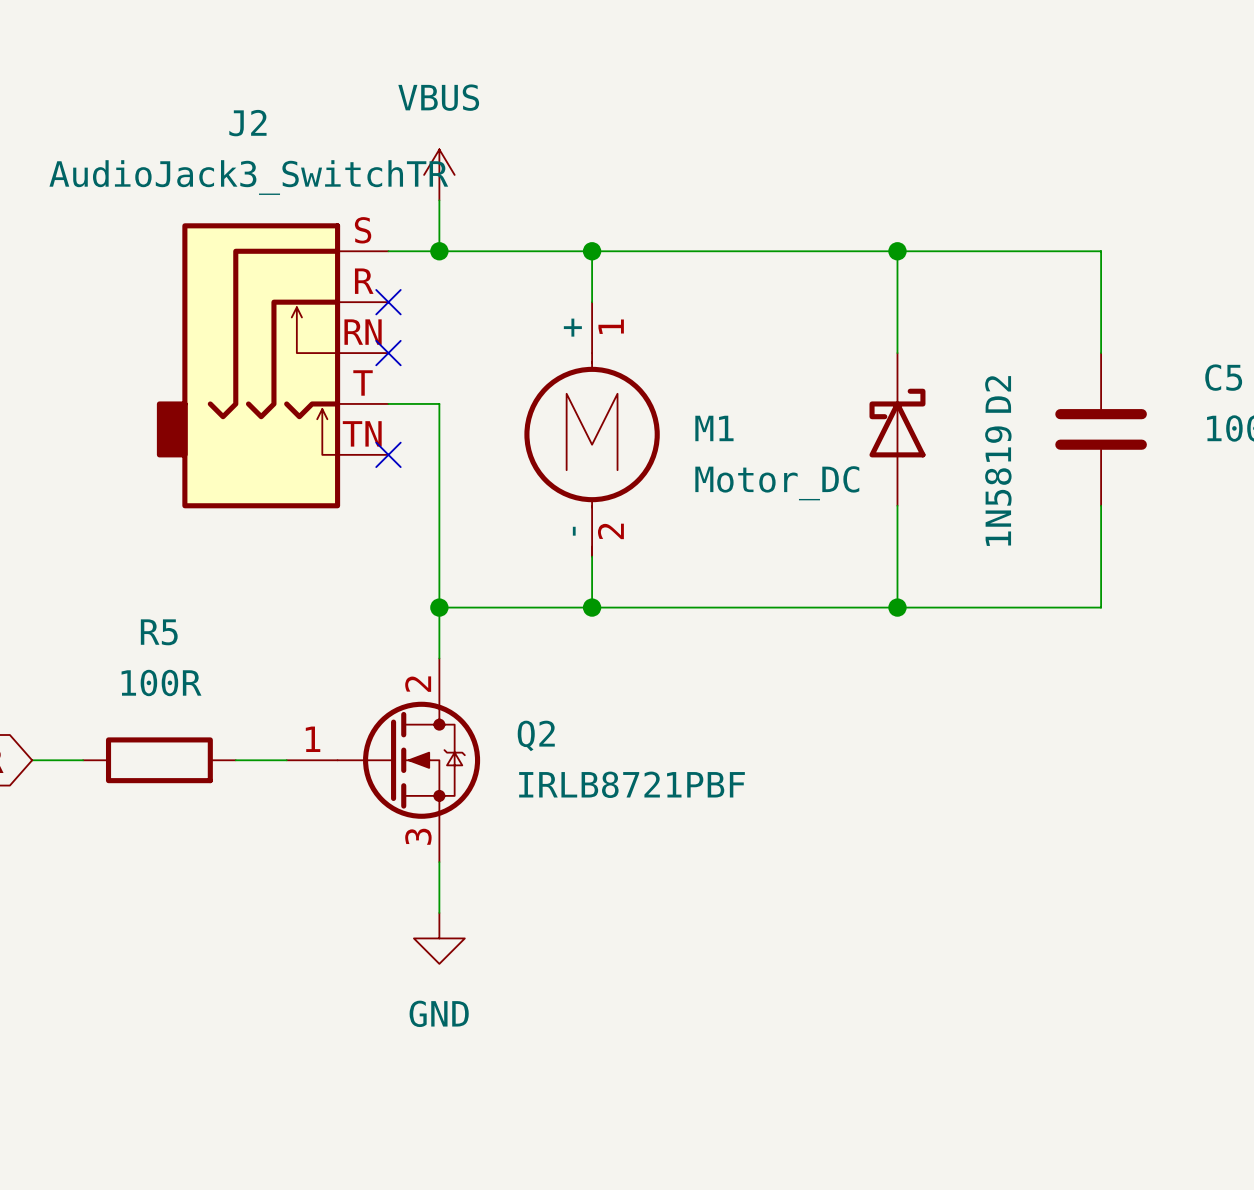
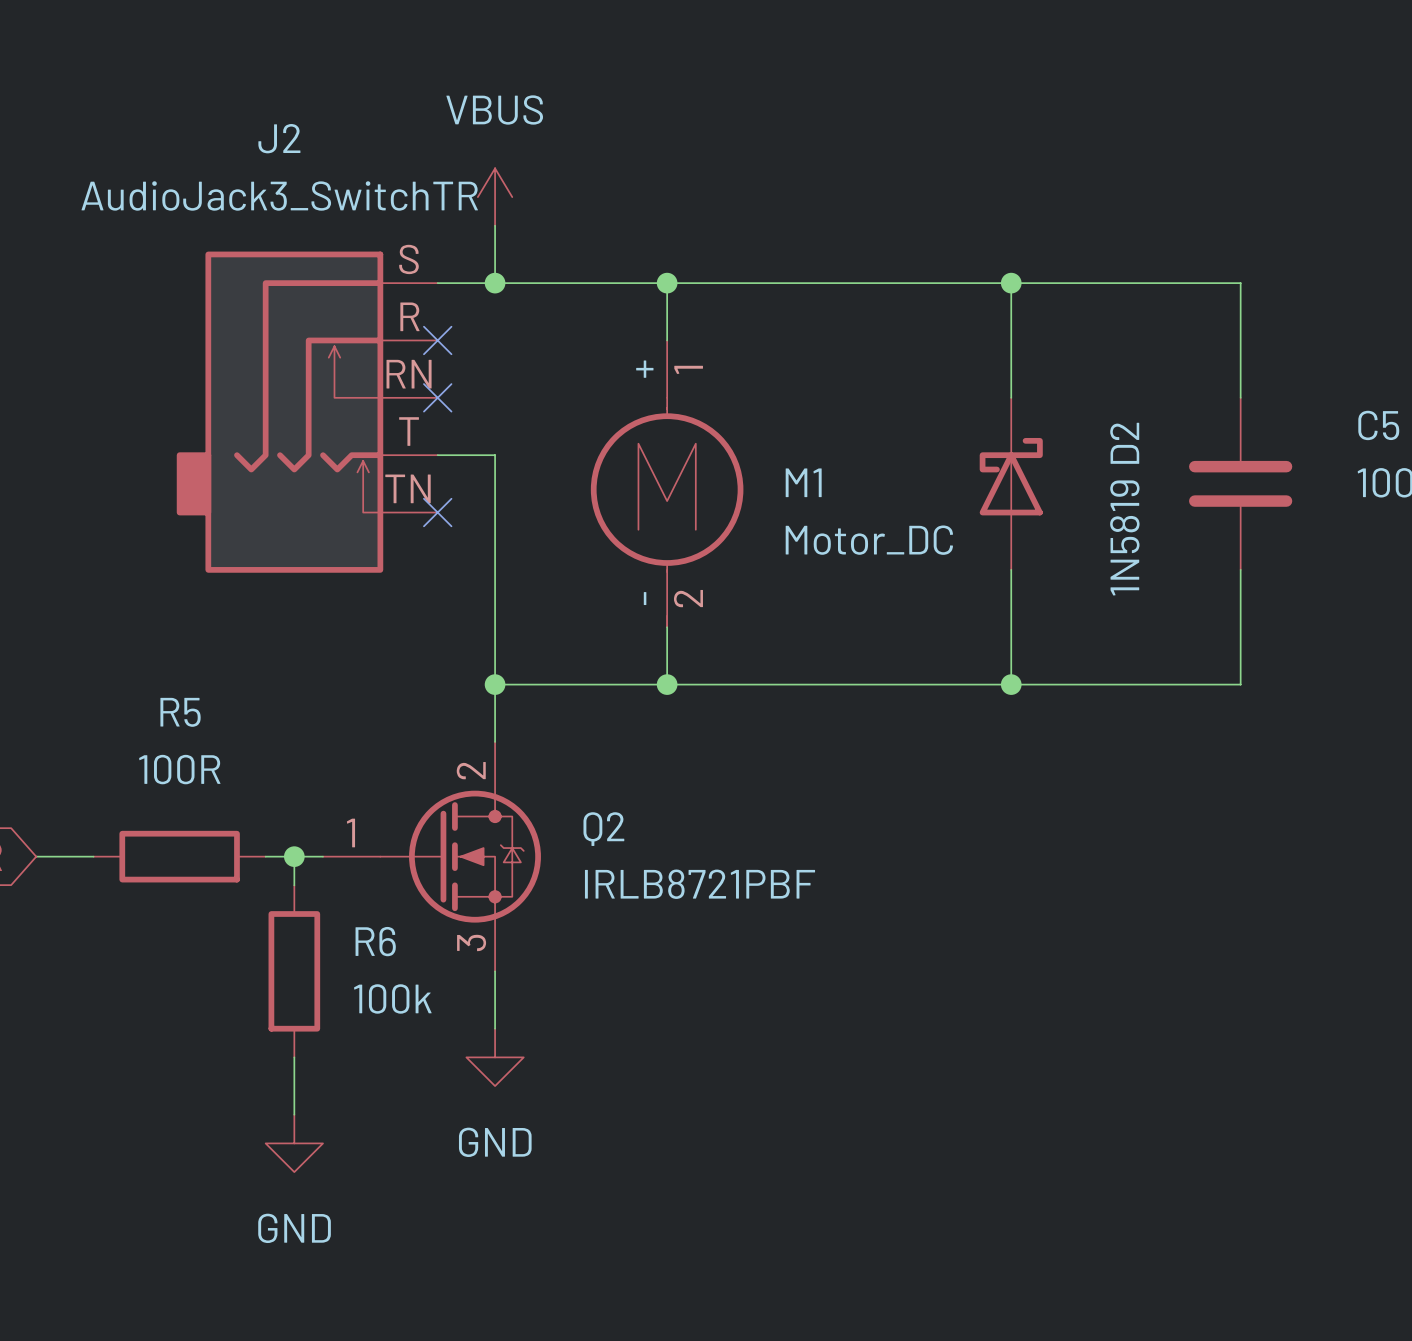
wire: none -> (294, 856) (294, 885)
junction: none -> (294, 856)
R6: none -> 100k (294, 971)
wire: none -> (294, 1057) (294, 1114)
power symbol: none -> GND (294, 1143)

